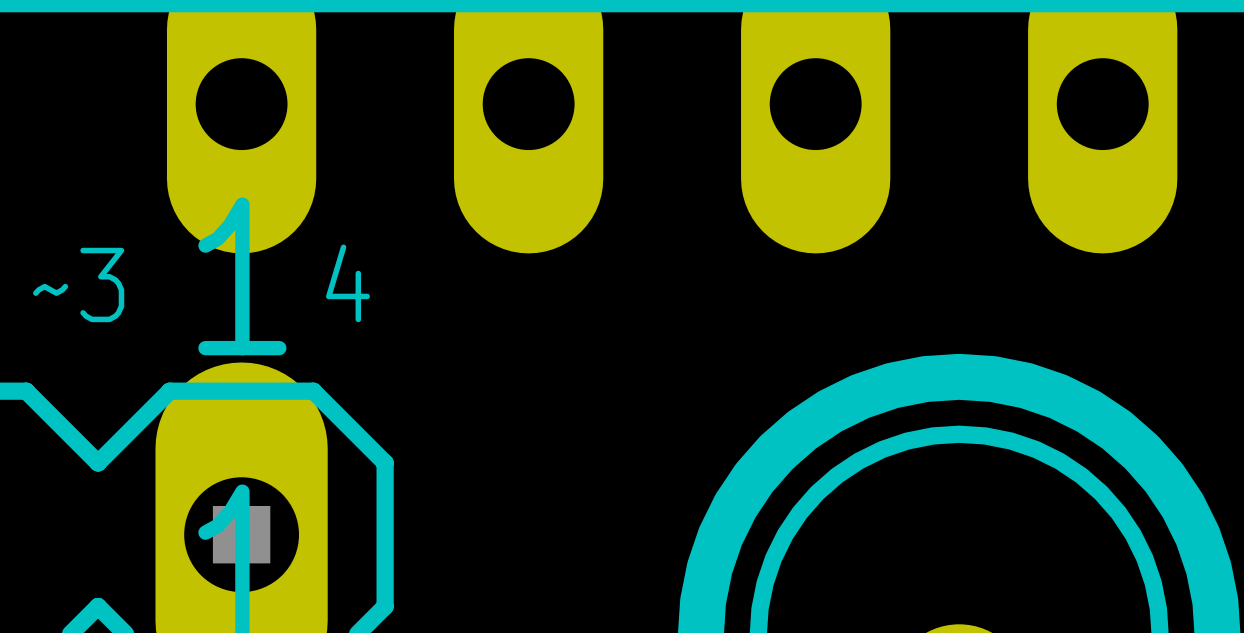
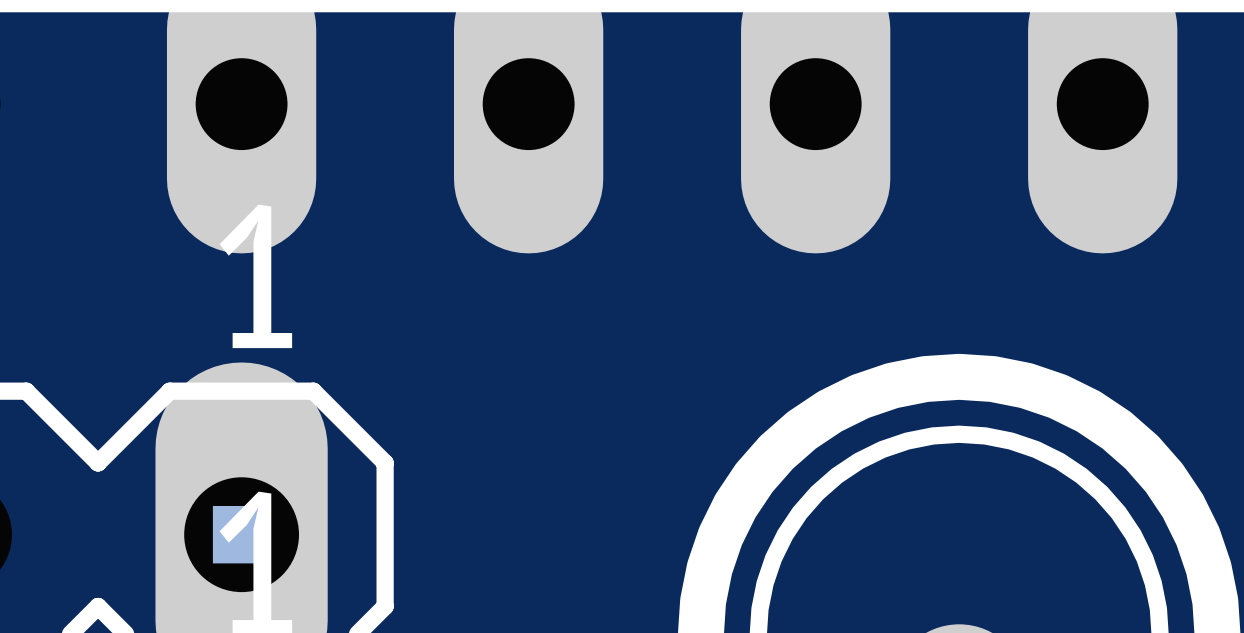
text: 4 (347, 283) -> none
text: ~3 (78, 284) -> none

